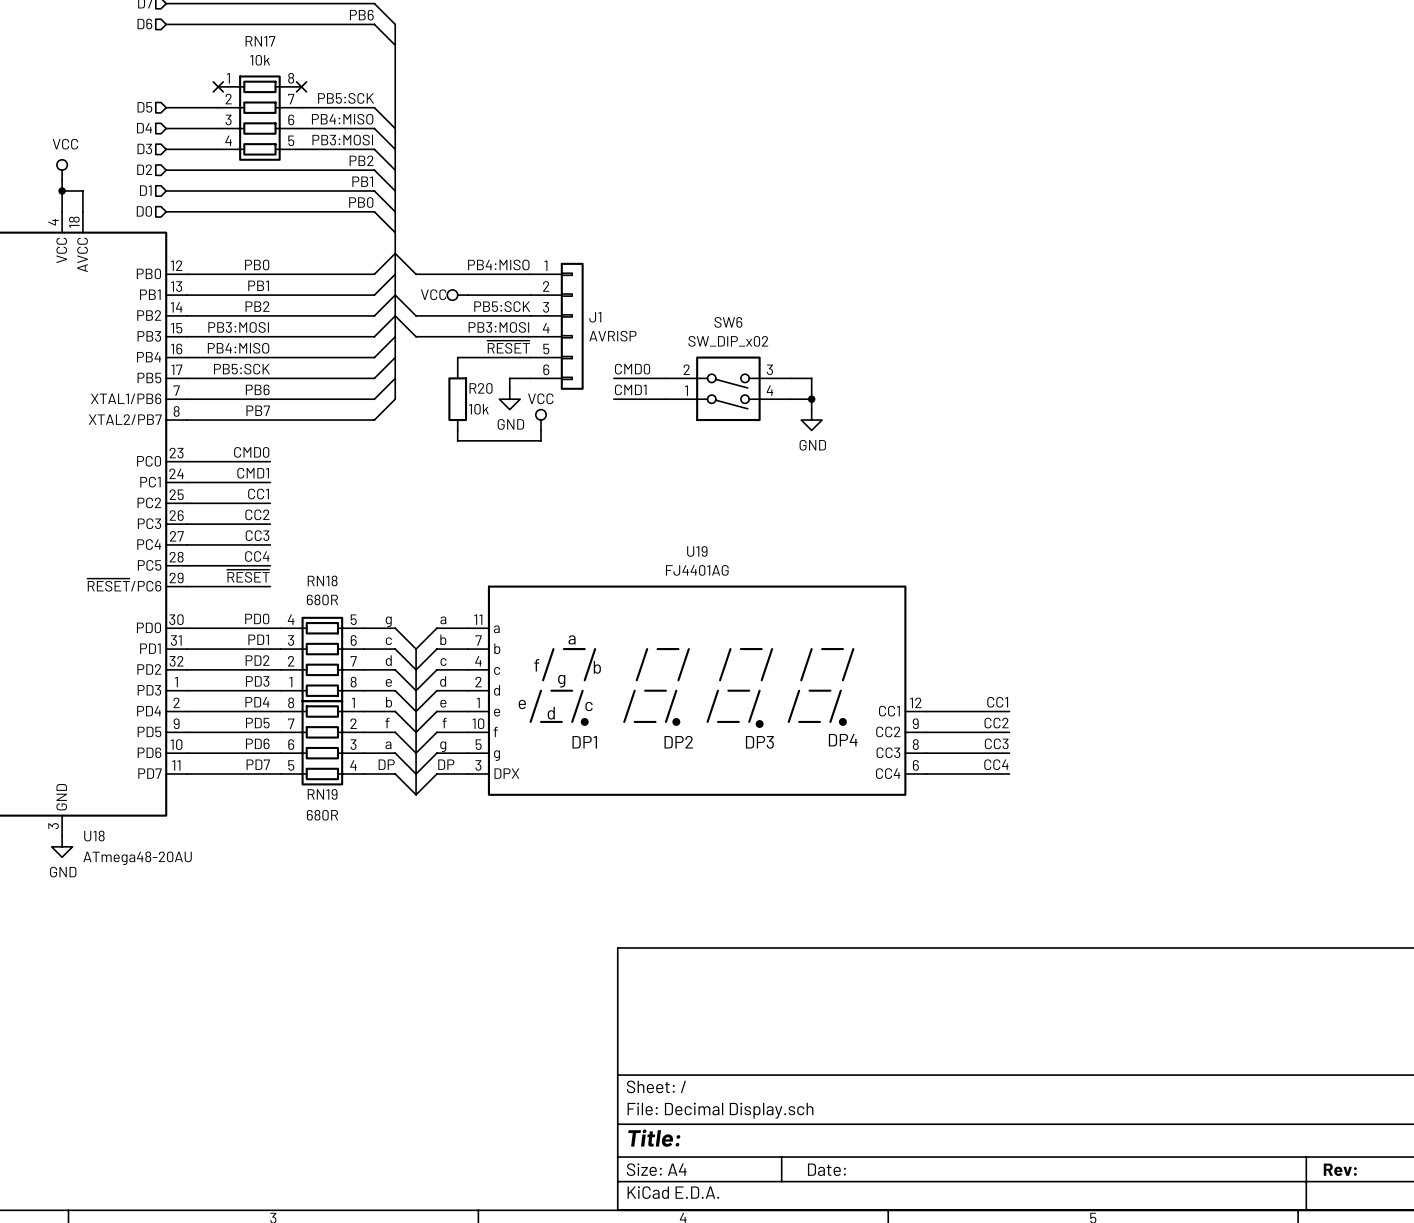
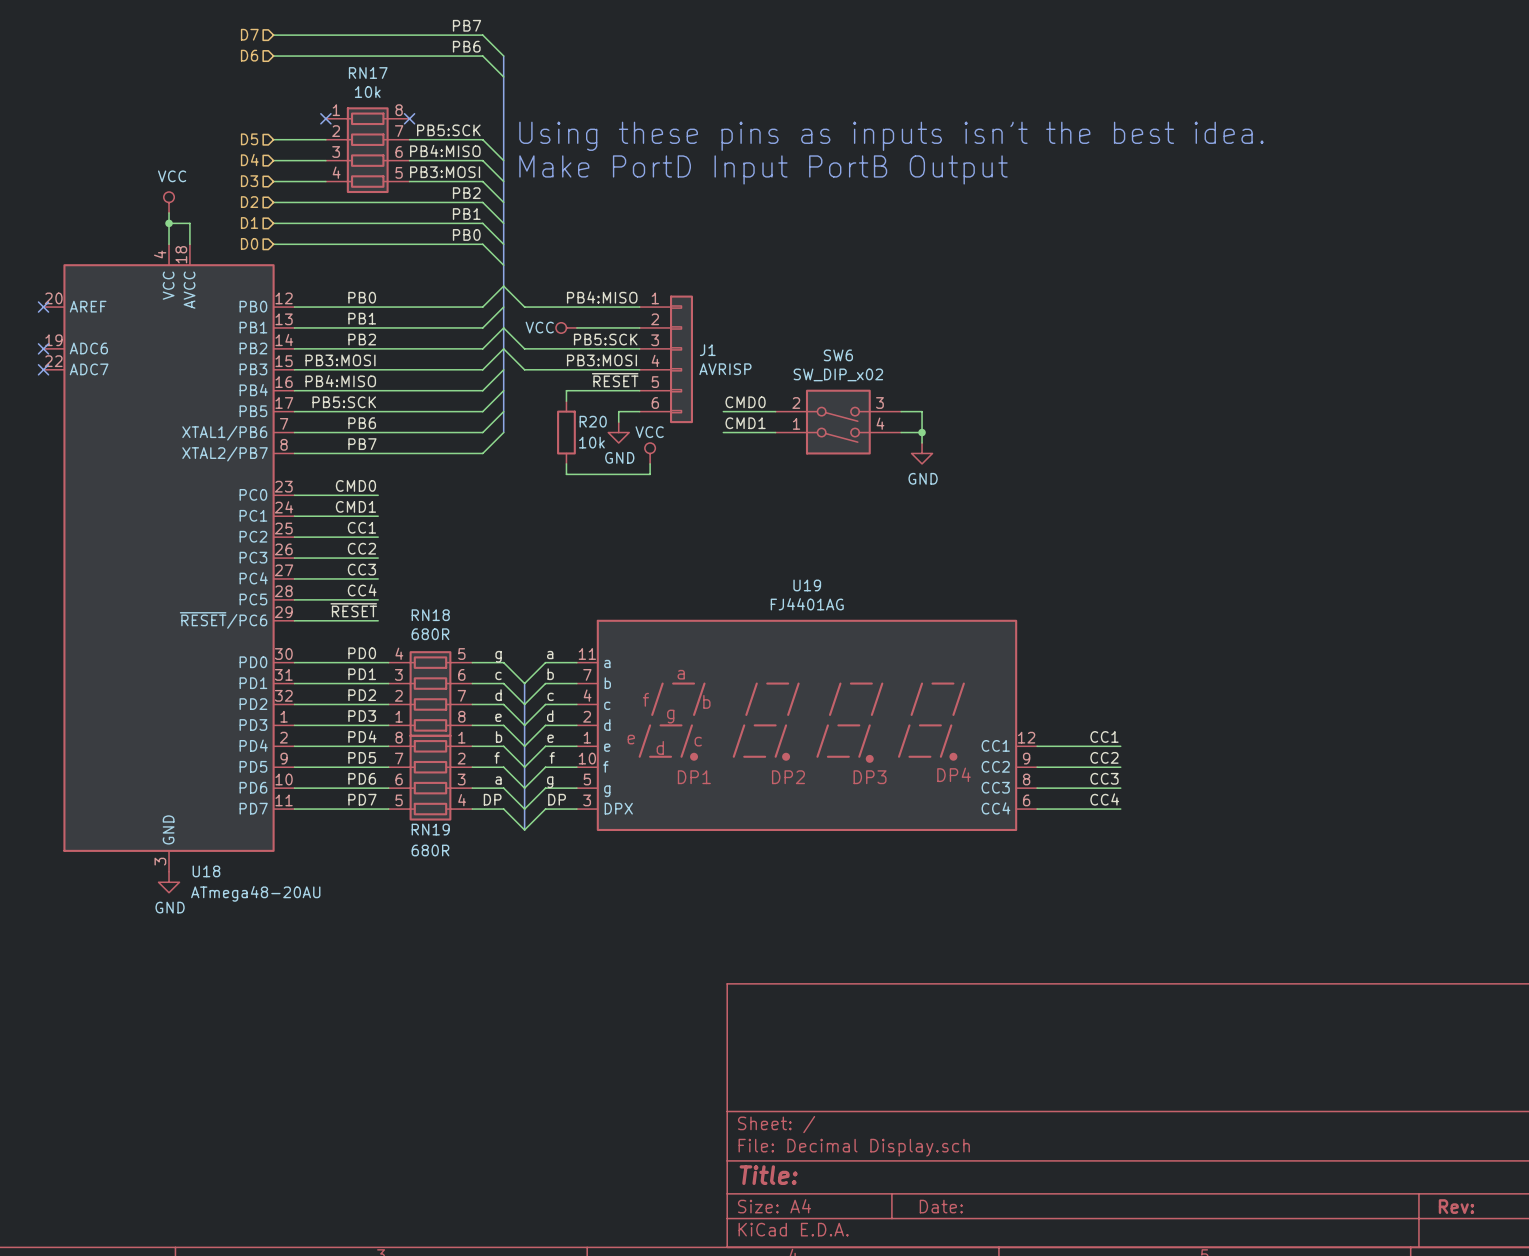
text: none -> Using these pins as inputs isn’t the best idea. (891, 136)
text: none -> Make PortD Input PortB Output (763, 169)

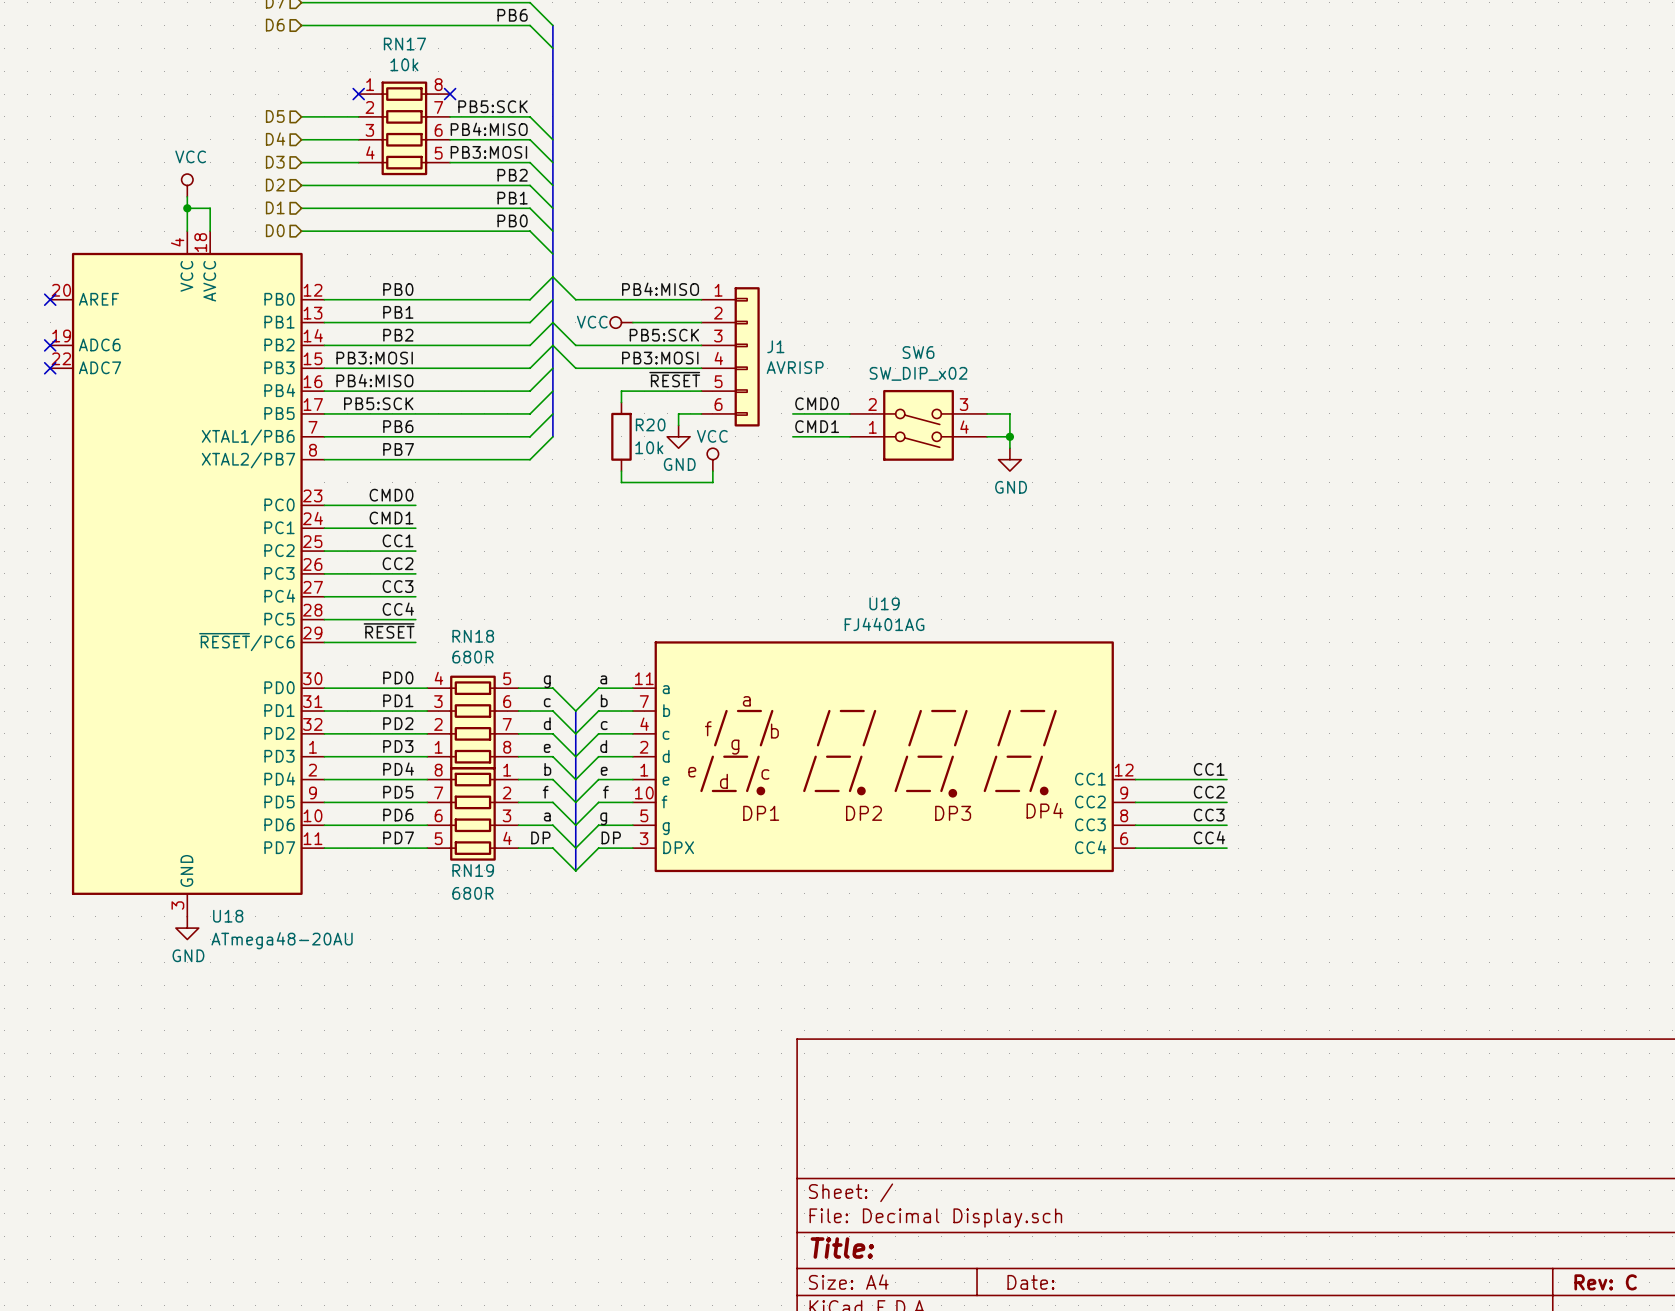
text: Using these pins as inputs isn’t the best idea. (891, 136) -> none
text: Make PortD Input PortB Output (763, 169) -> none
title block: Rev: (1456, 1206) -> Rev: C (1605, 1282)

